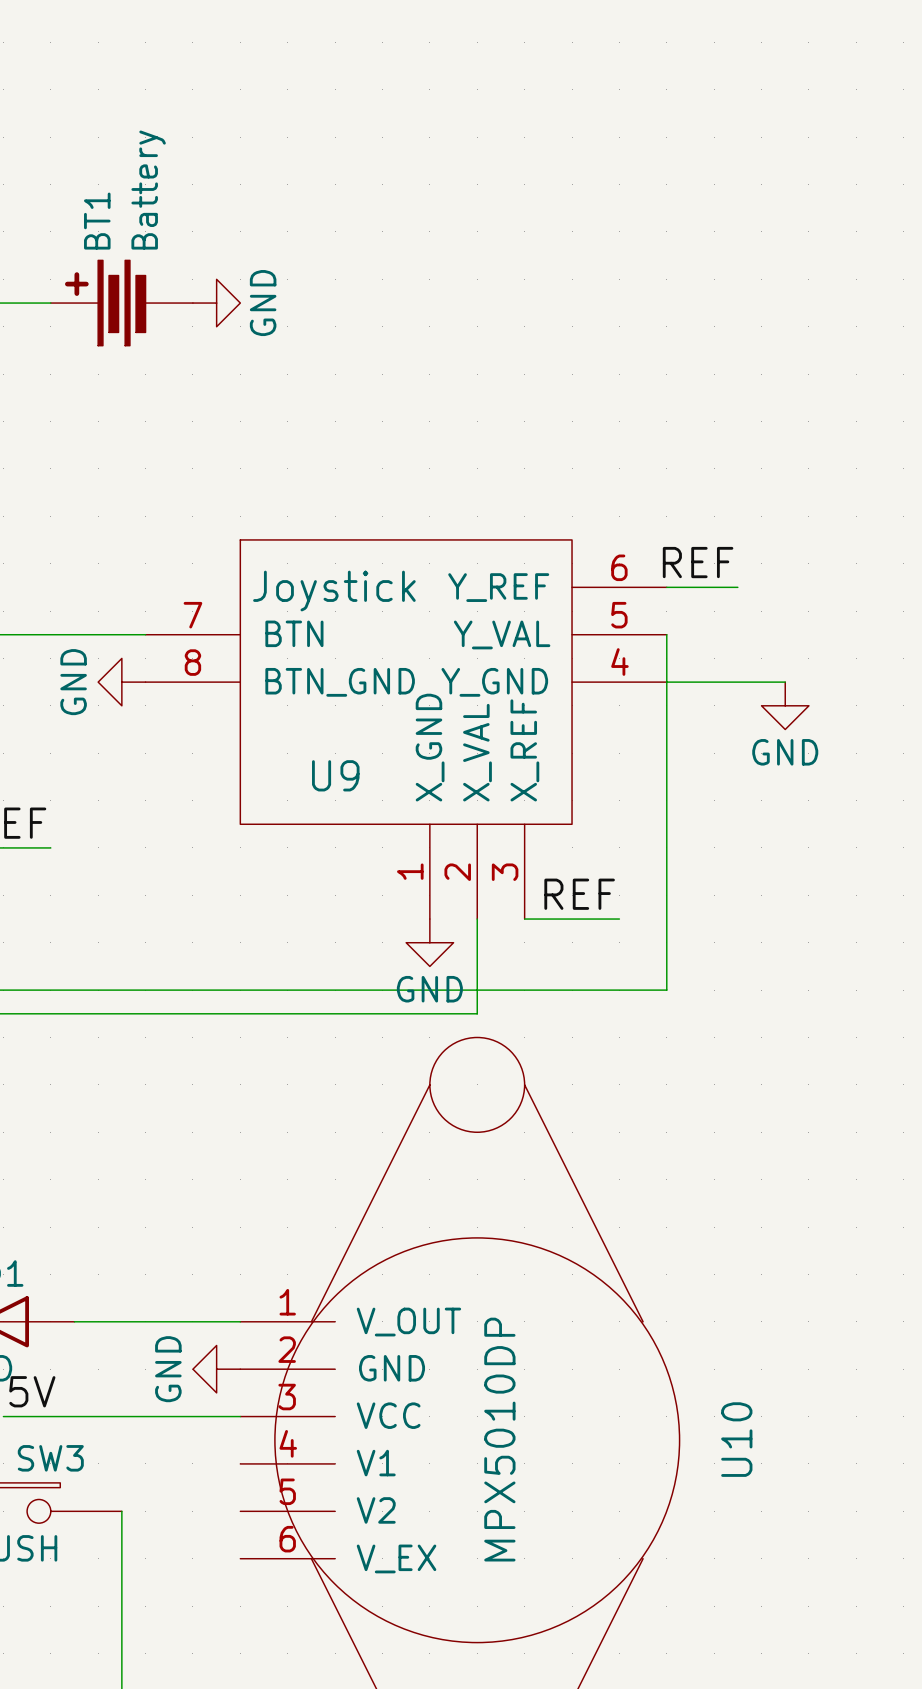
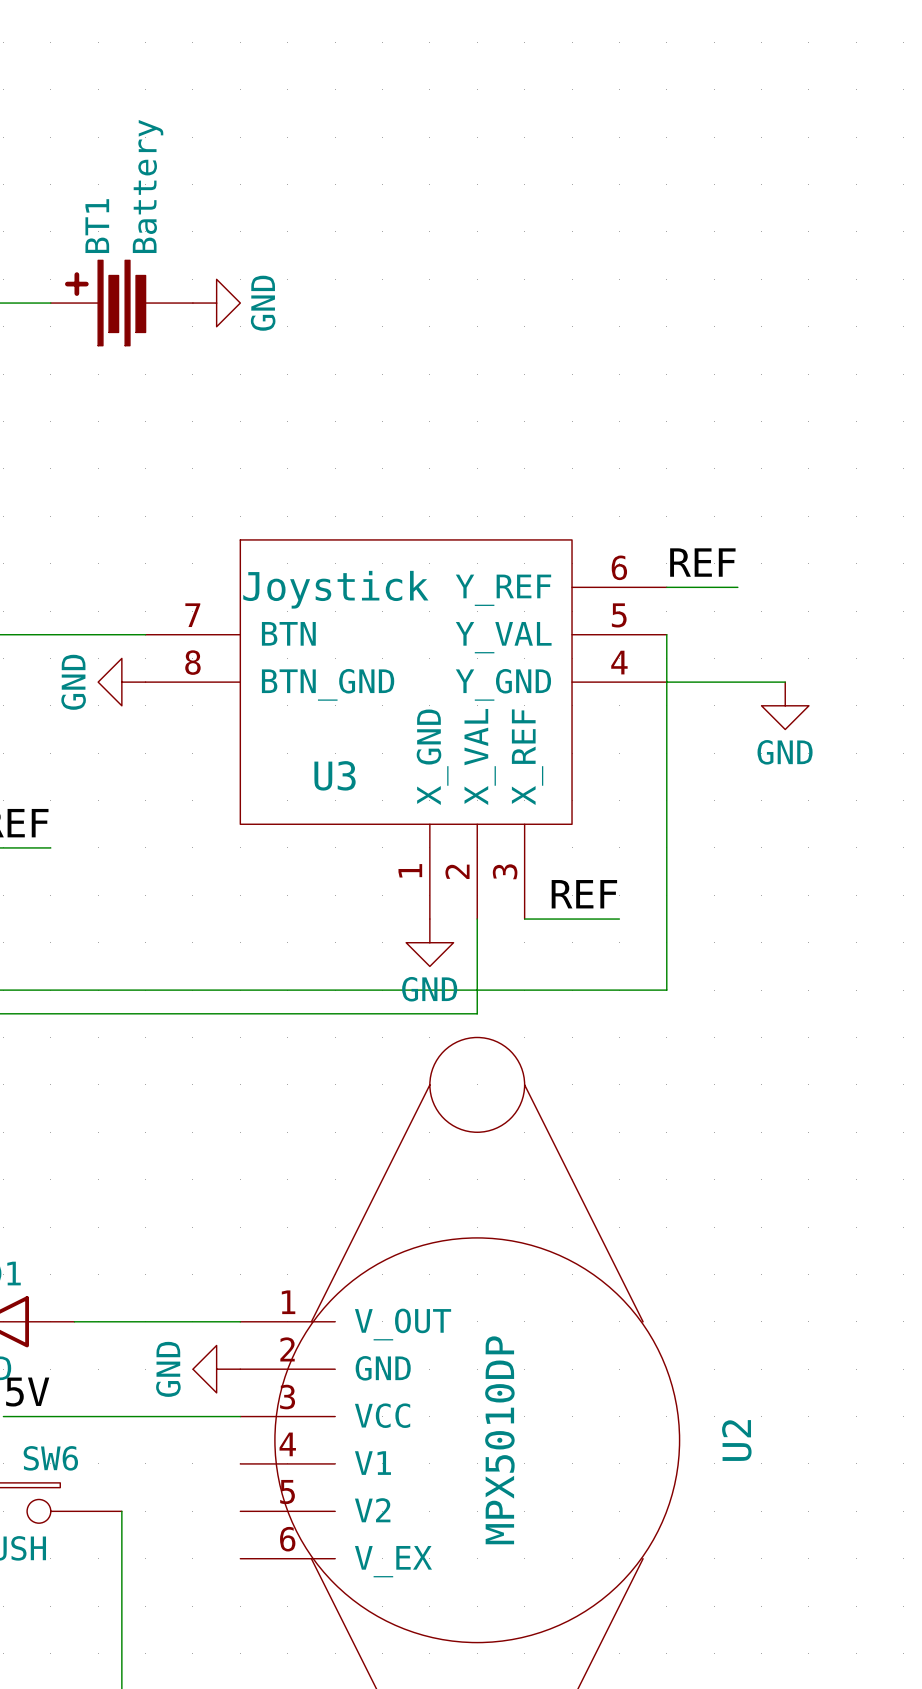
U9 name: U9 (335, 775) -> U3 (335, 775)
U10 name: U10 (736, 1439) -> U2 (736, 1440)
SW3 name: SW3 (50, 1458) -> SW6 (50, 1458)

